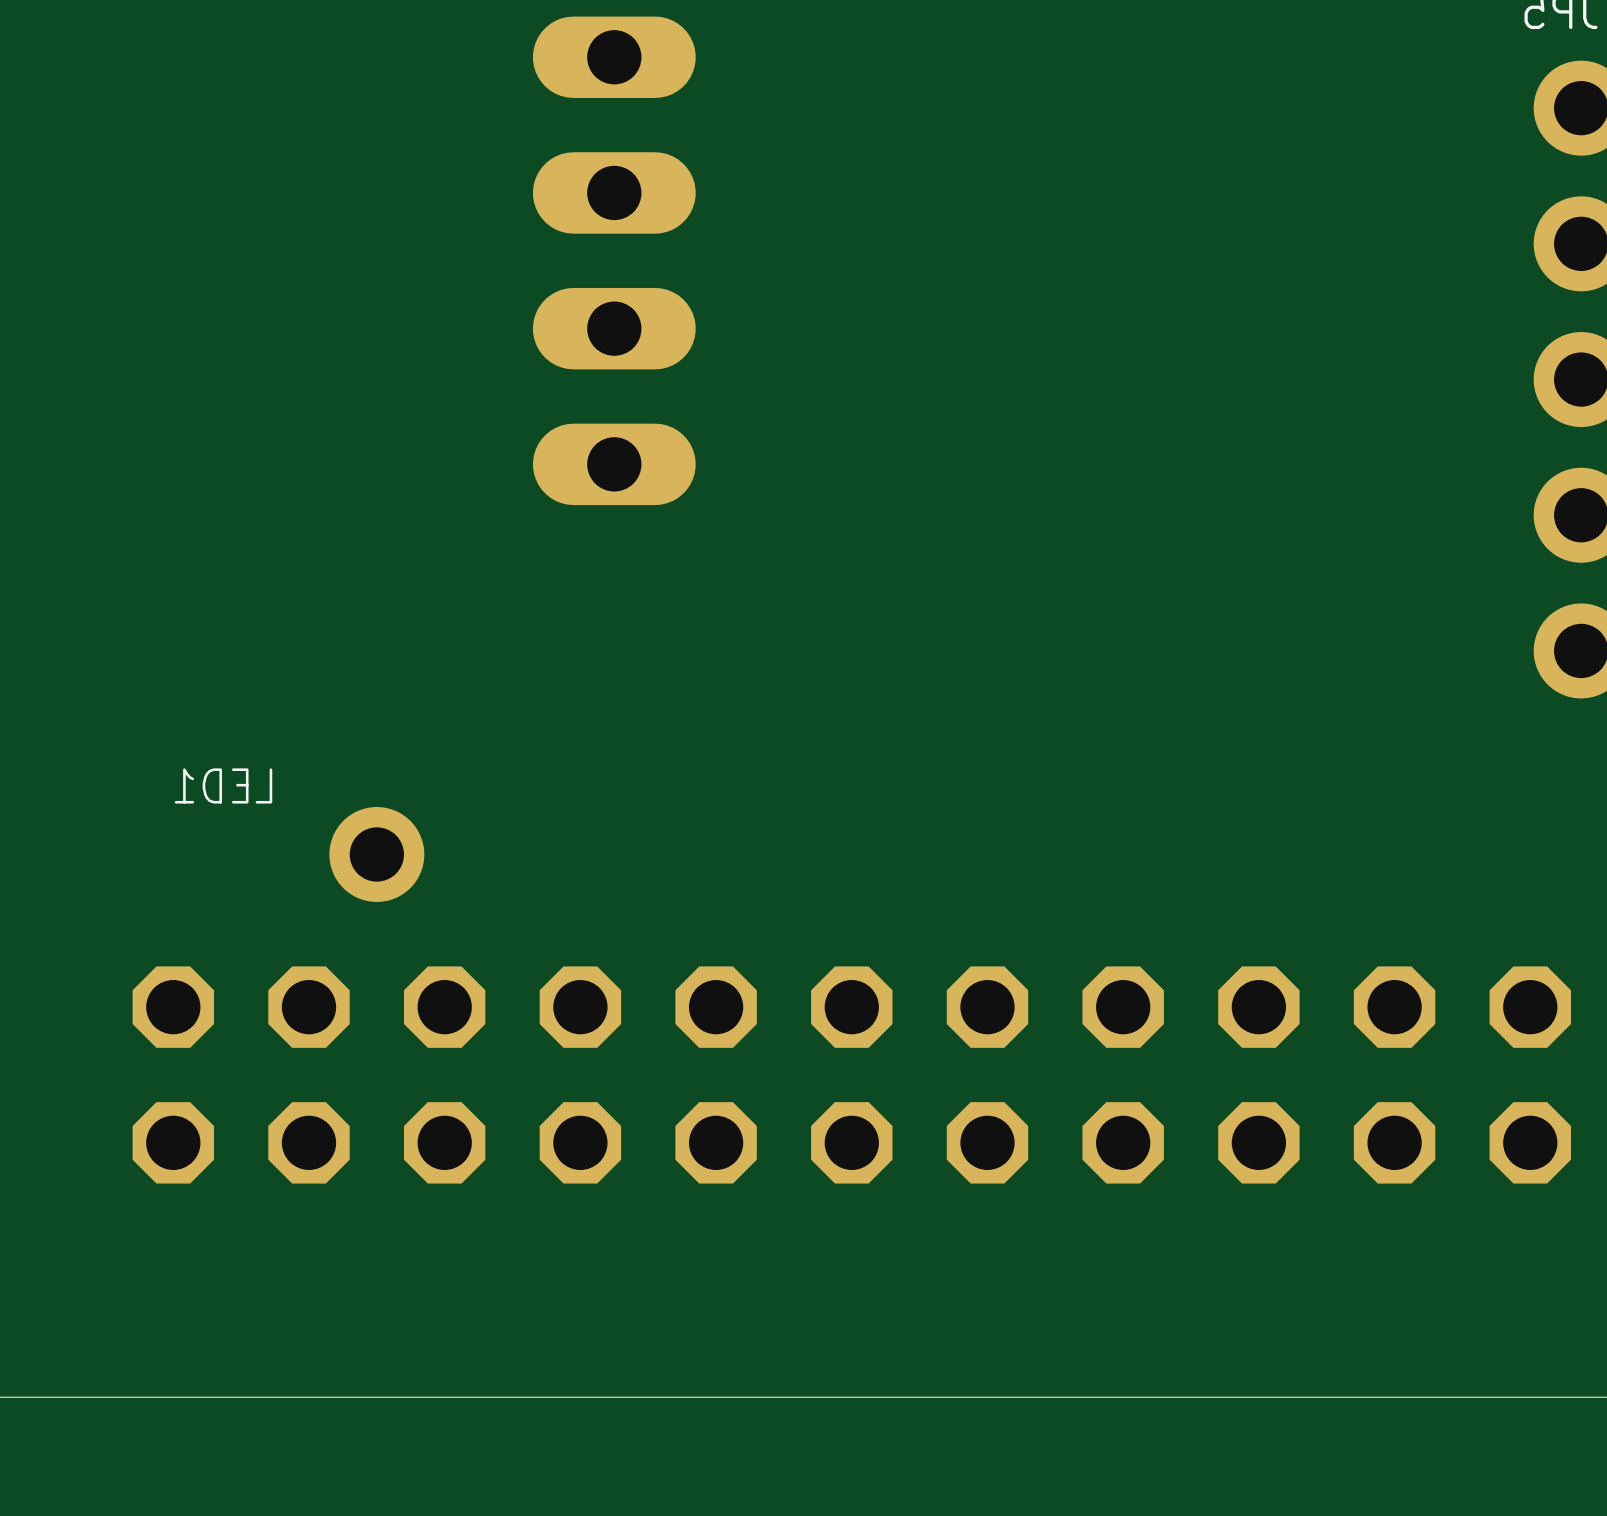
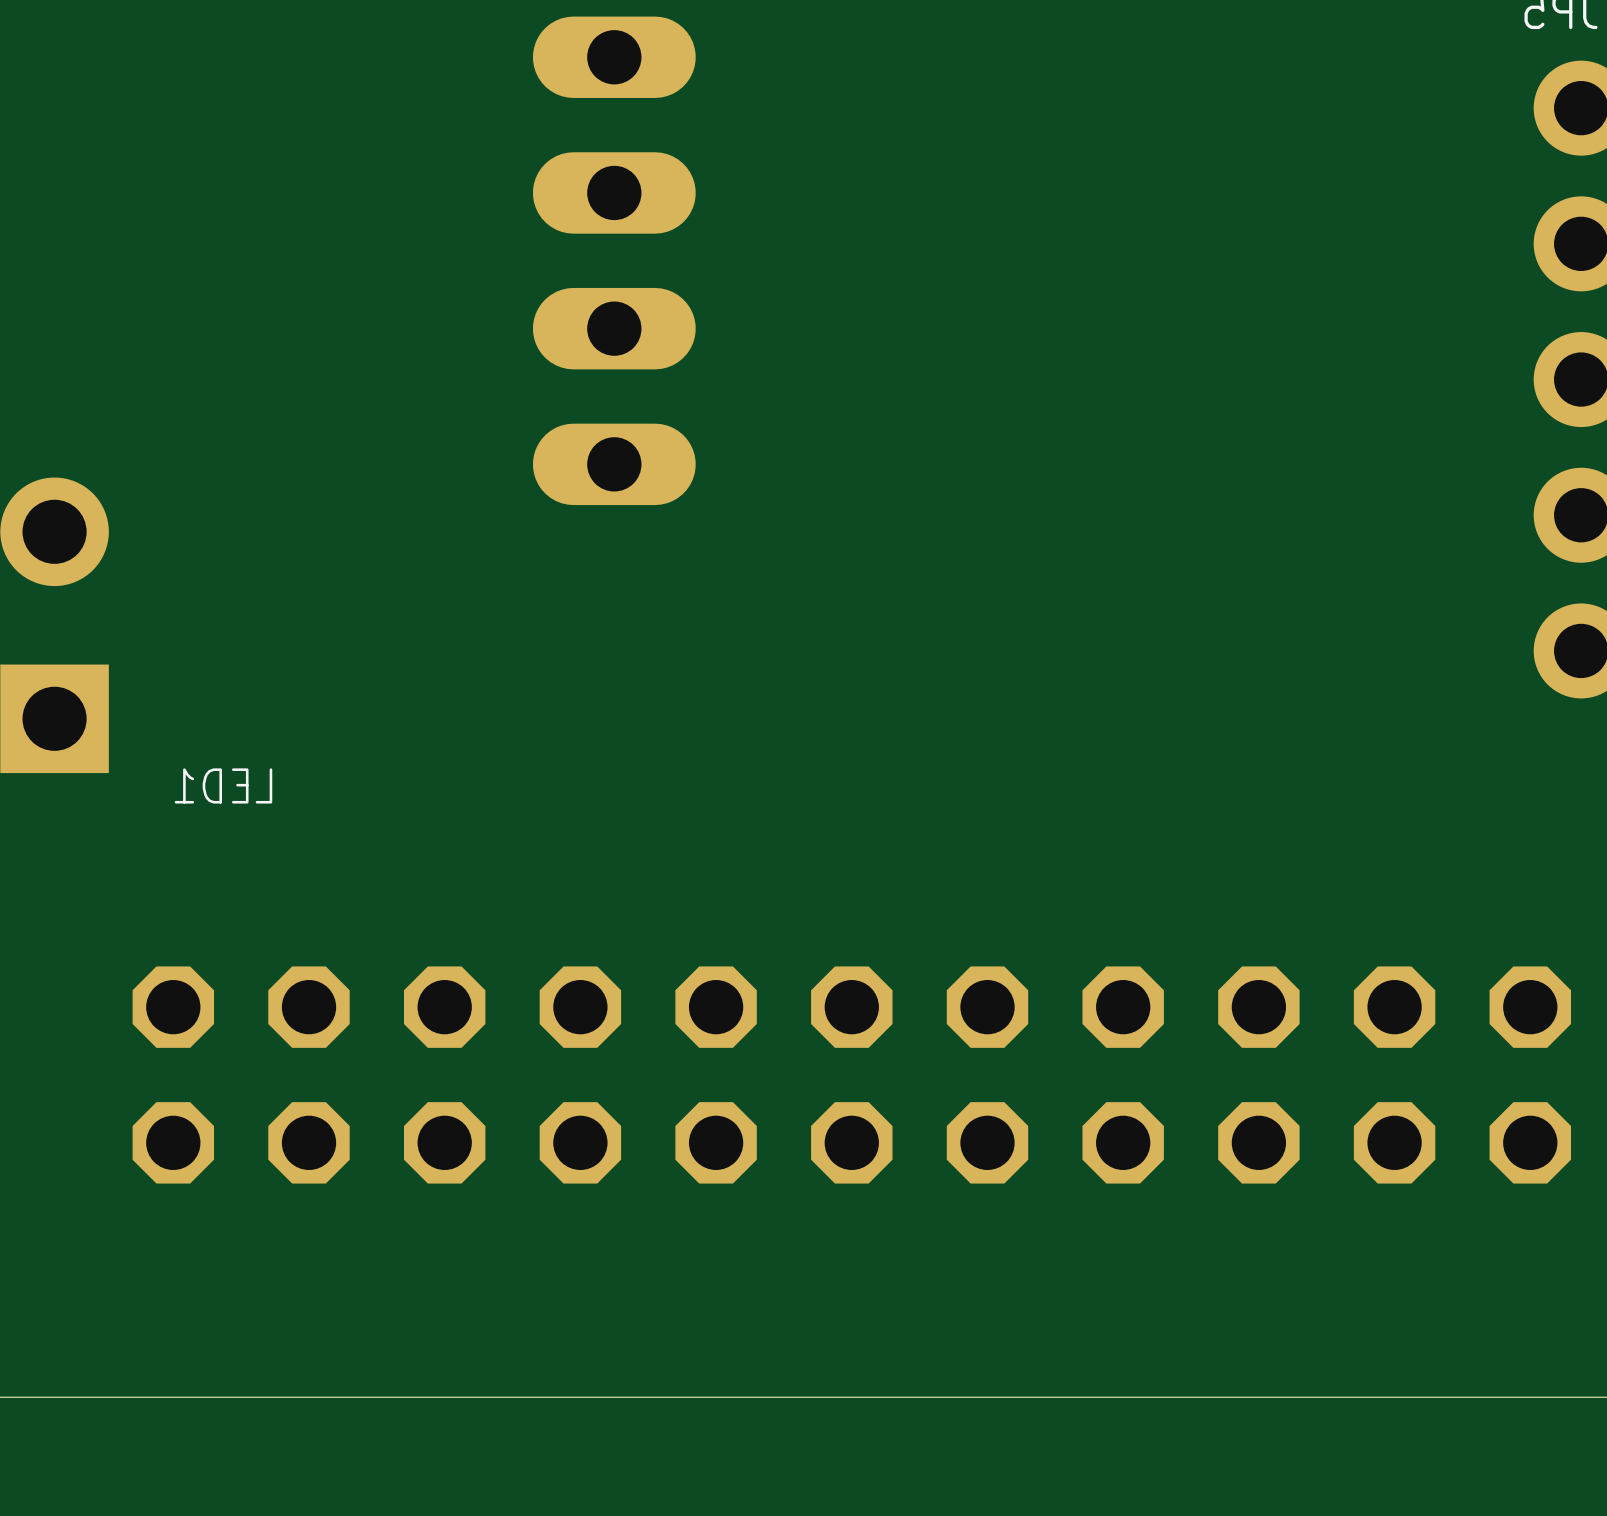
part: none -> (54, 625)
part: (376, 854) -> none

